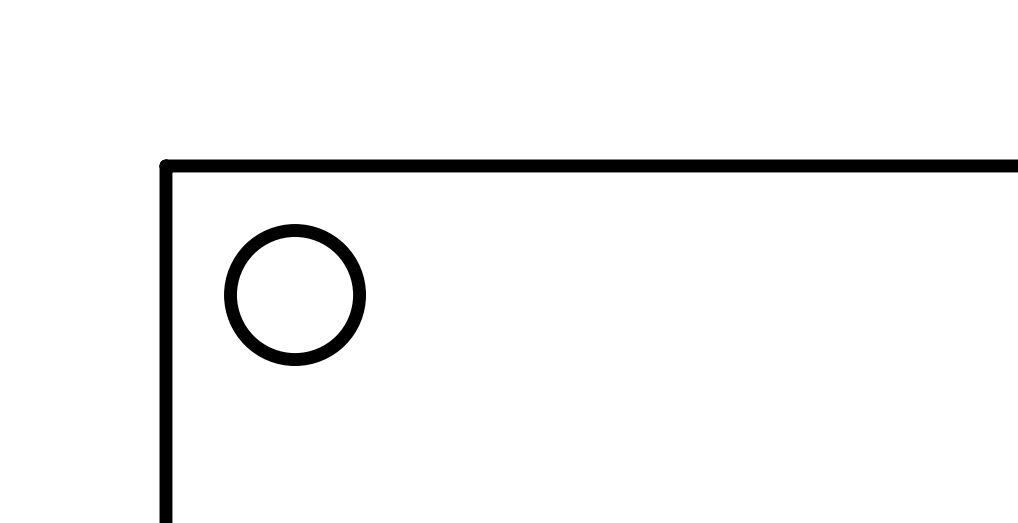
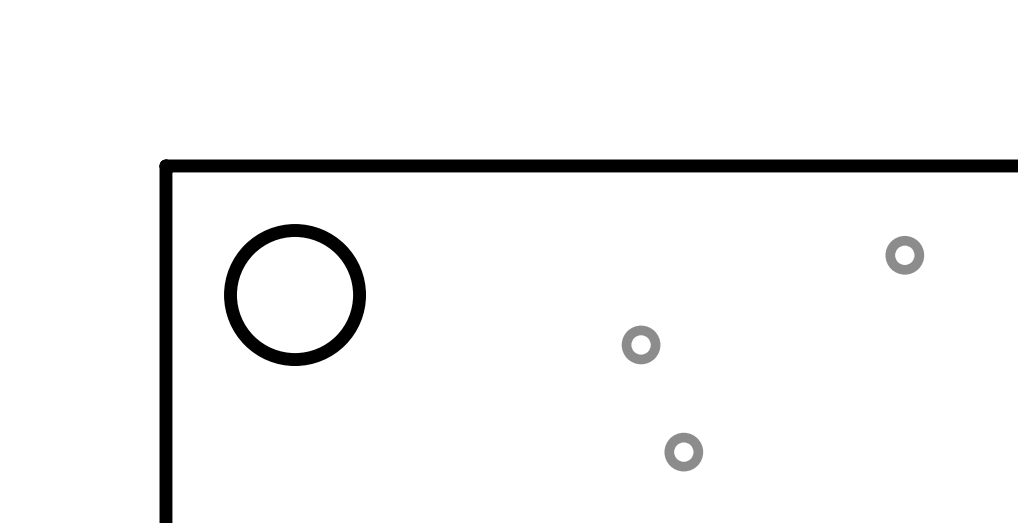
via: none -> (904, 255)
via: none -> (641, 344)
via: none -> (683, 452)

